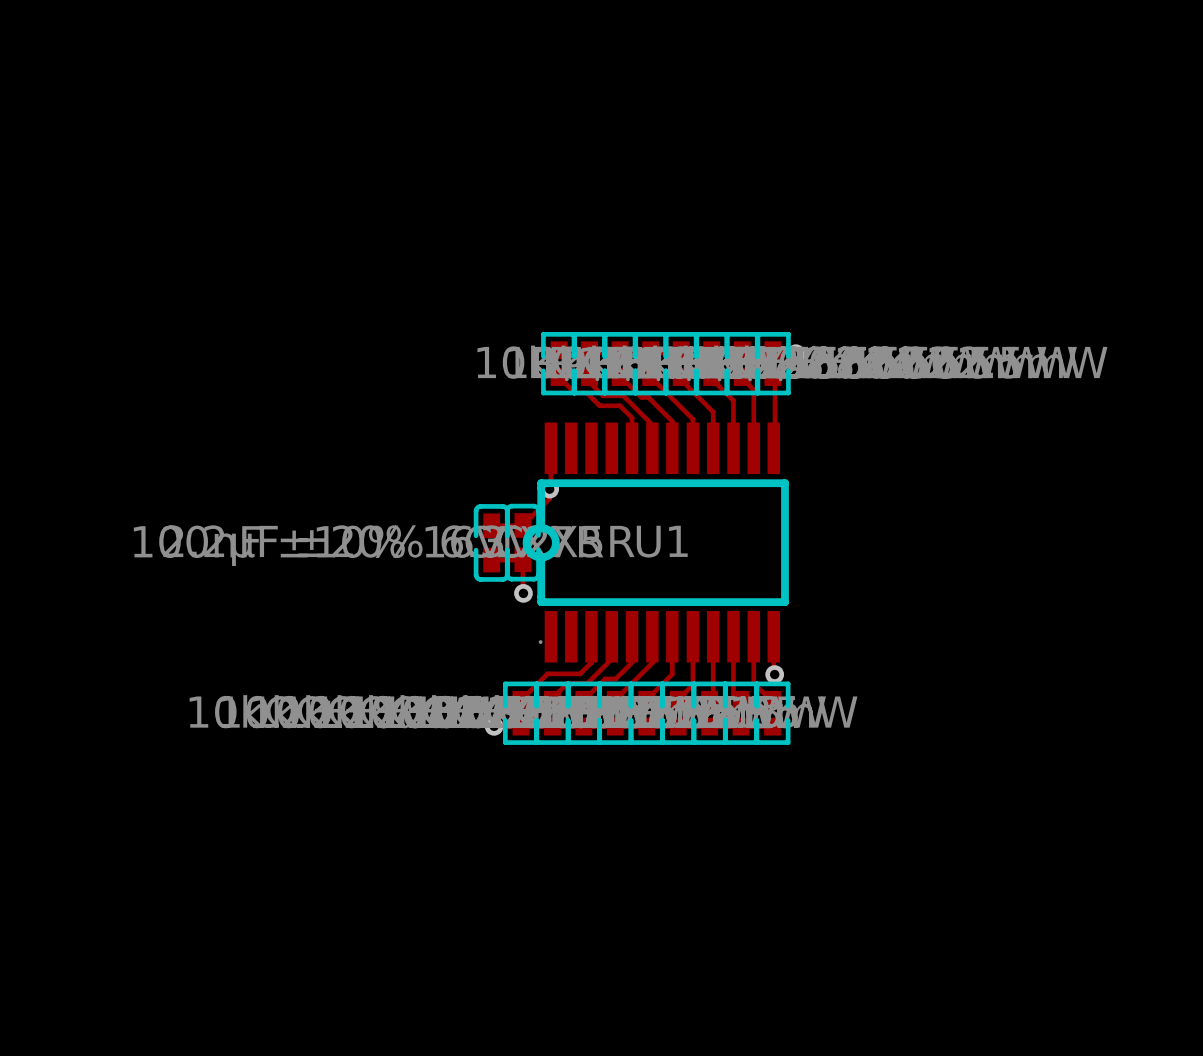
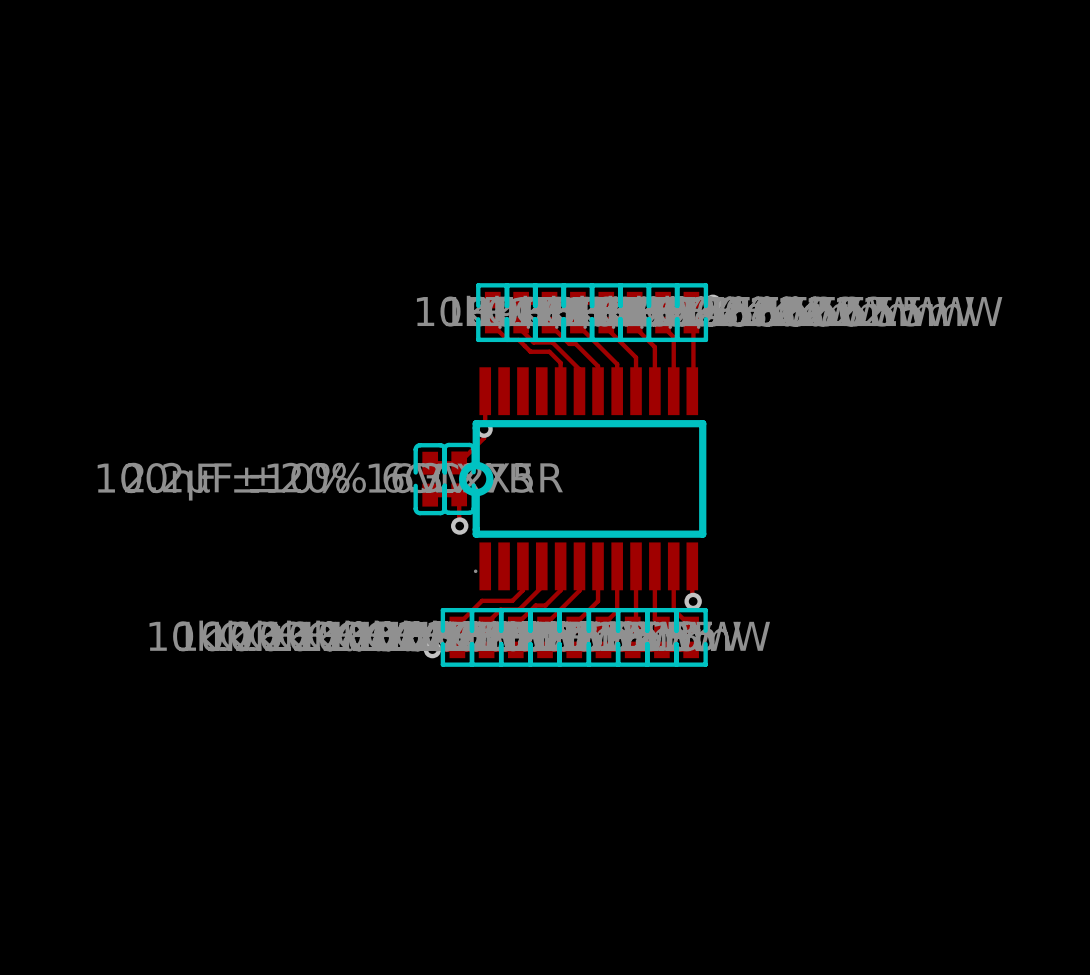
U1 name: U1 (662, 541) -> none

